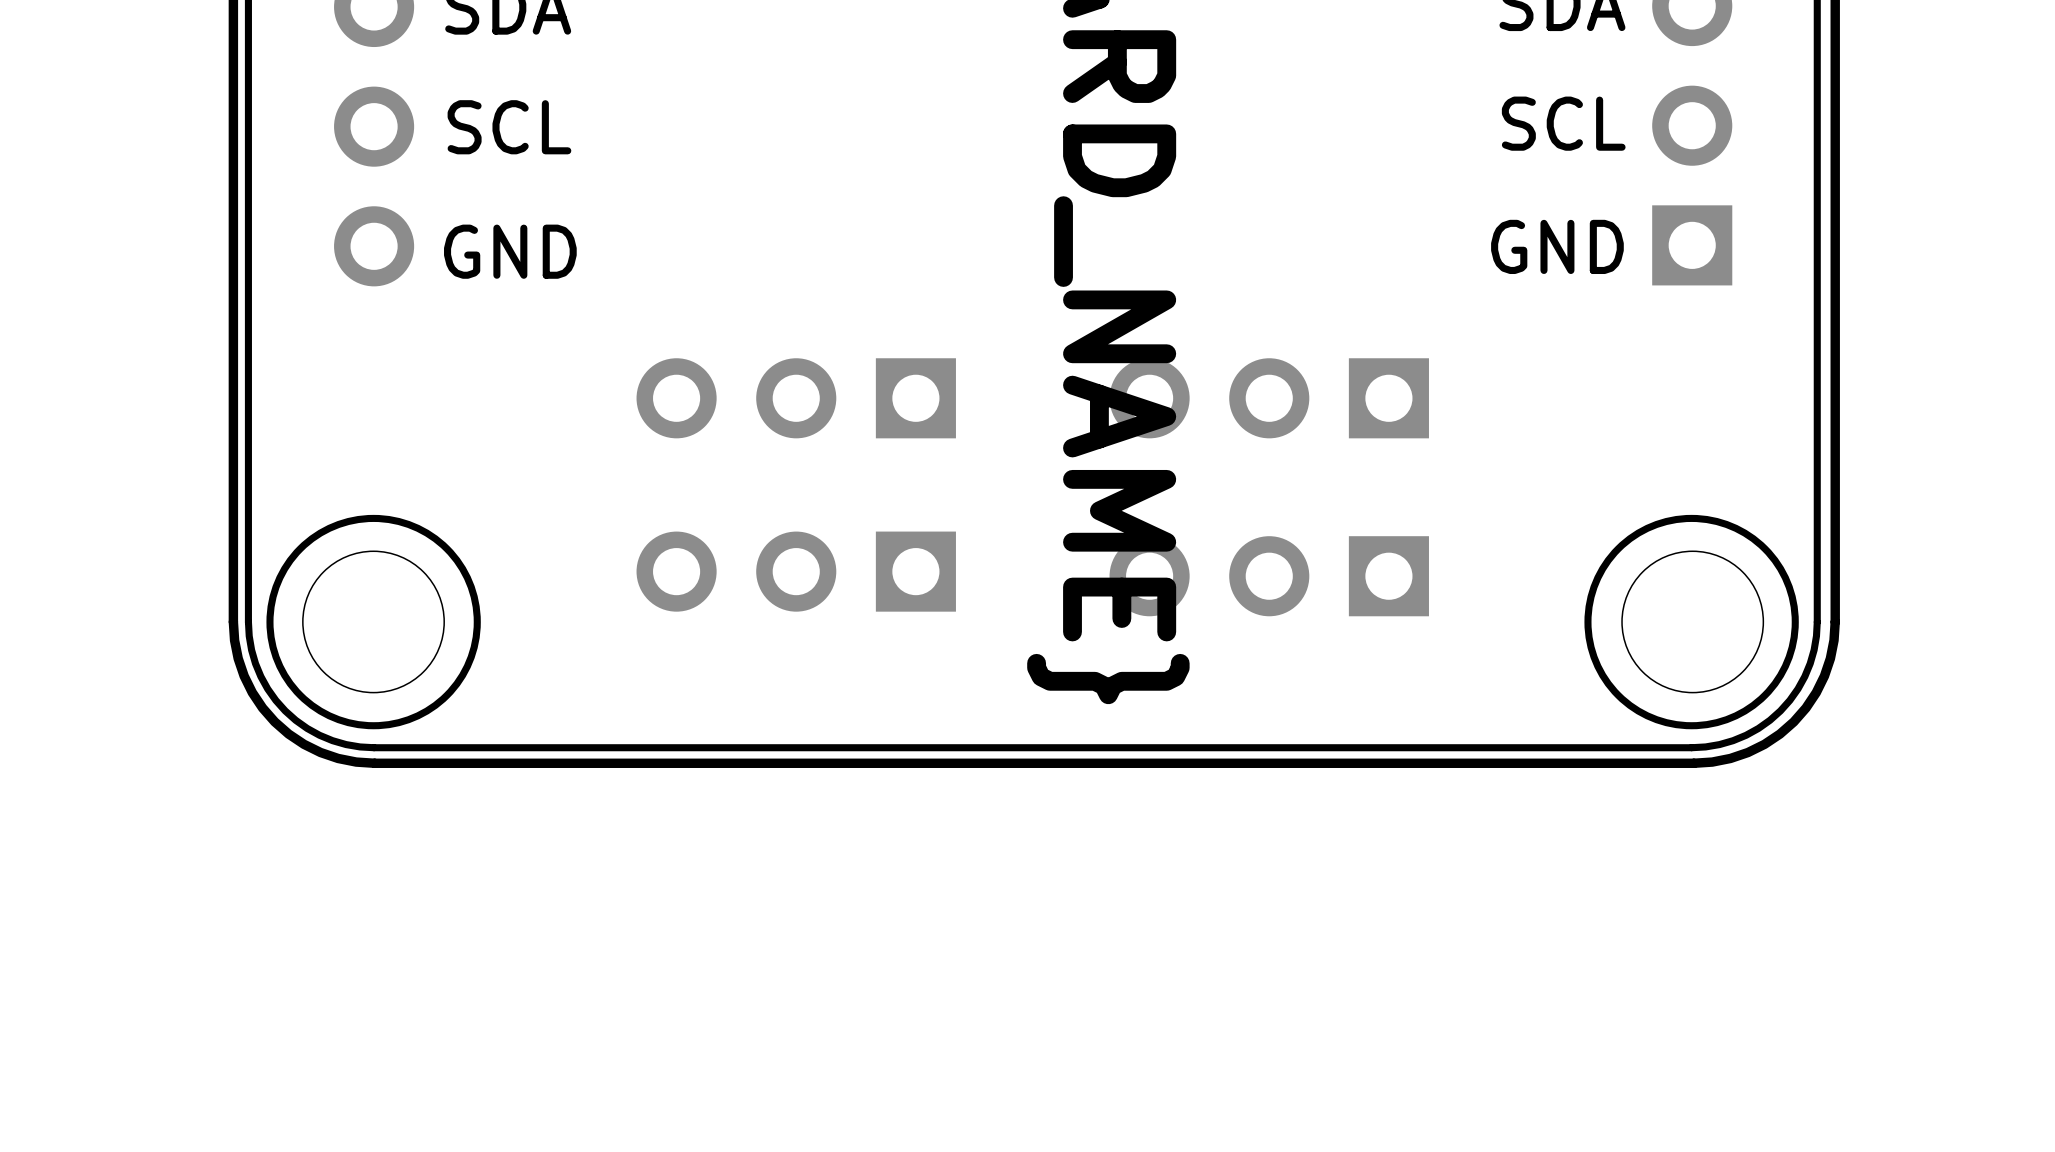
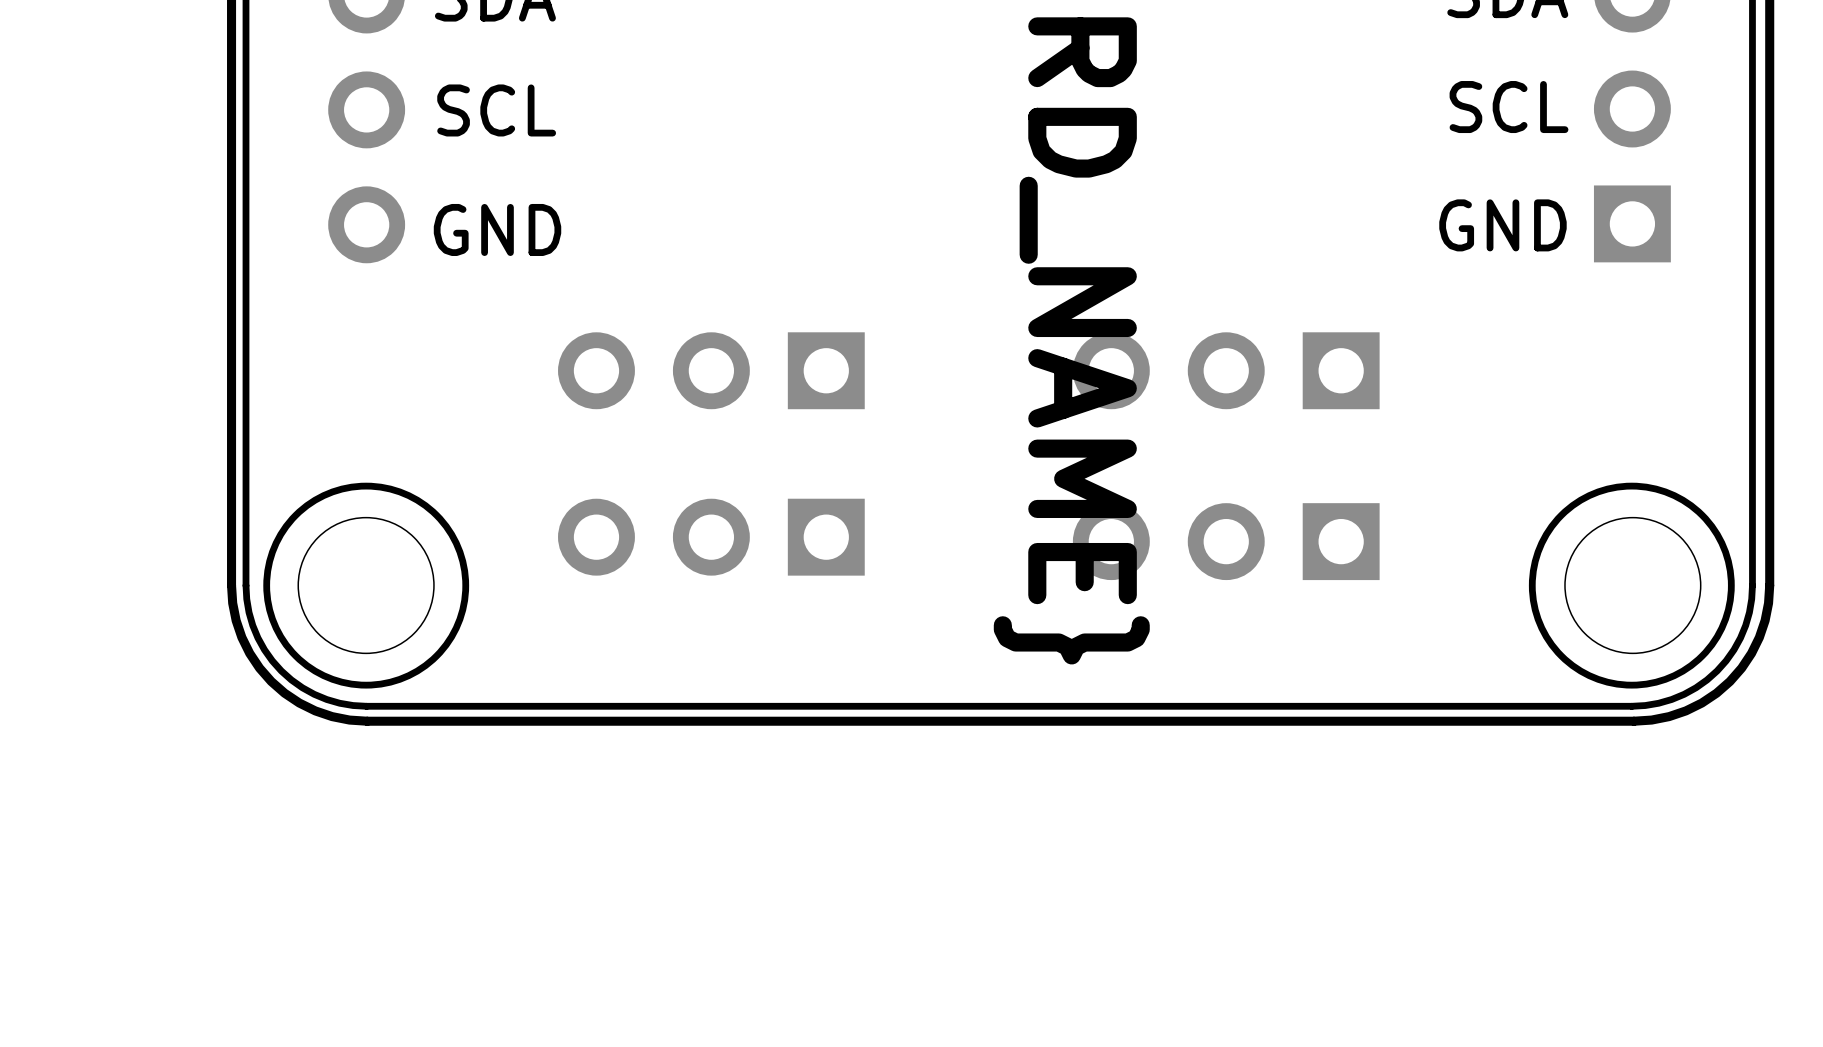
part position: (796, 398) -> (711, 370)
part position: (796, 571) -> (711, 537)

